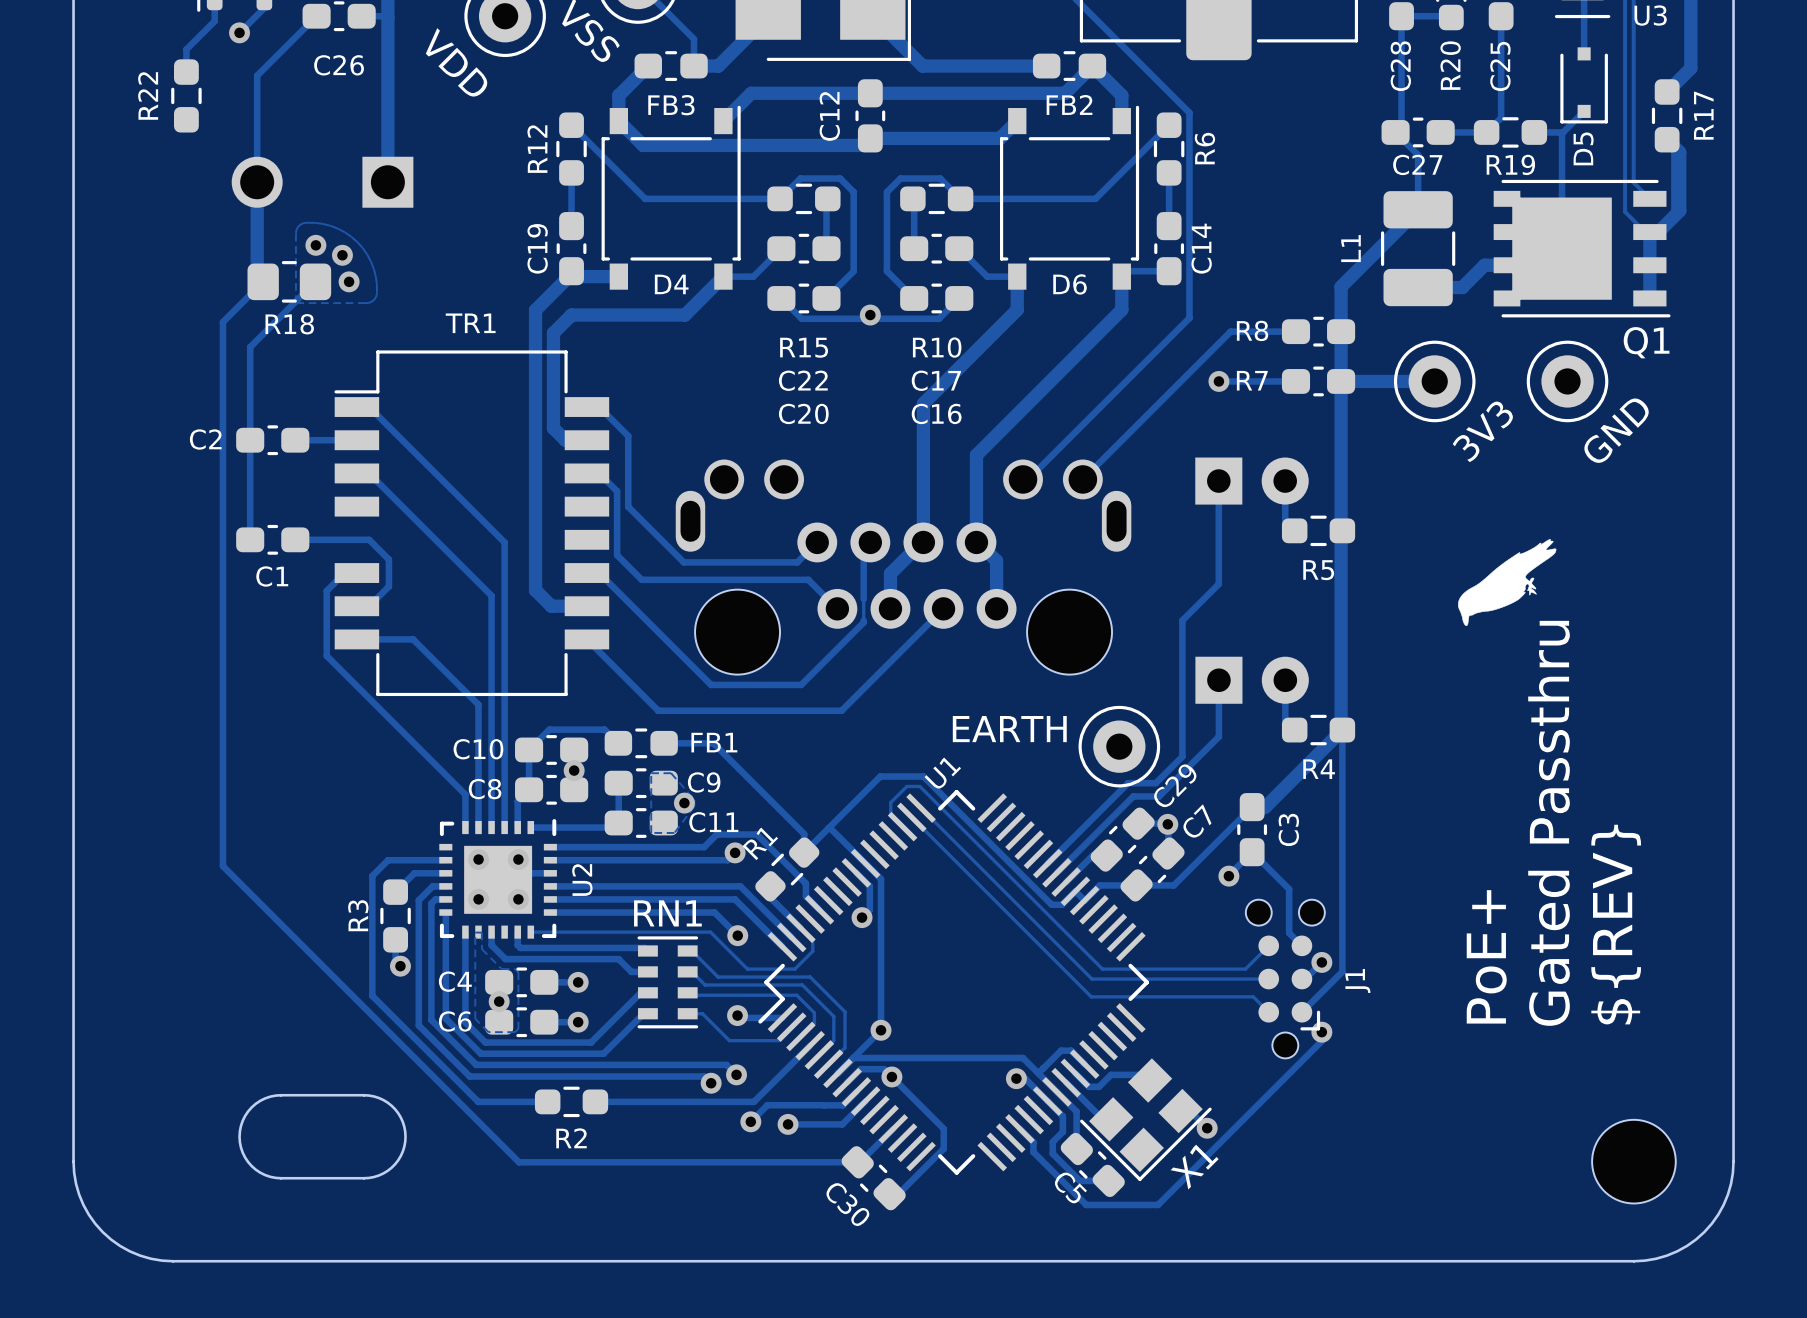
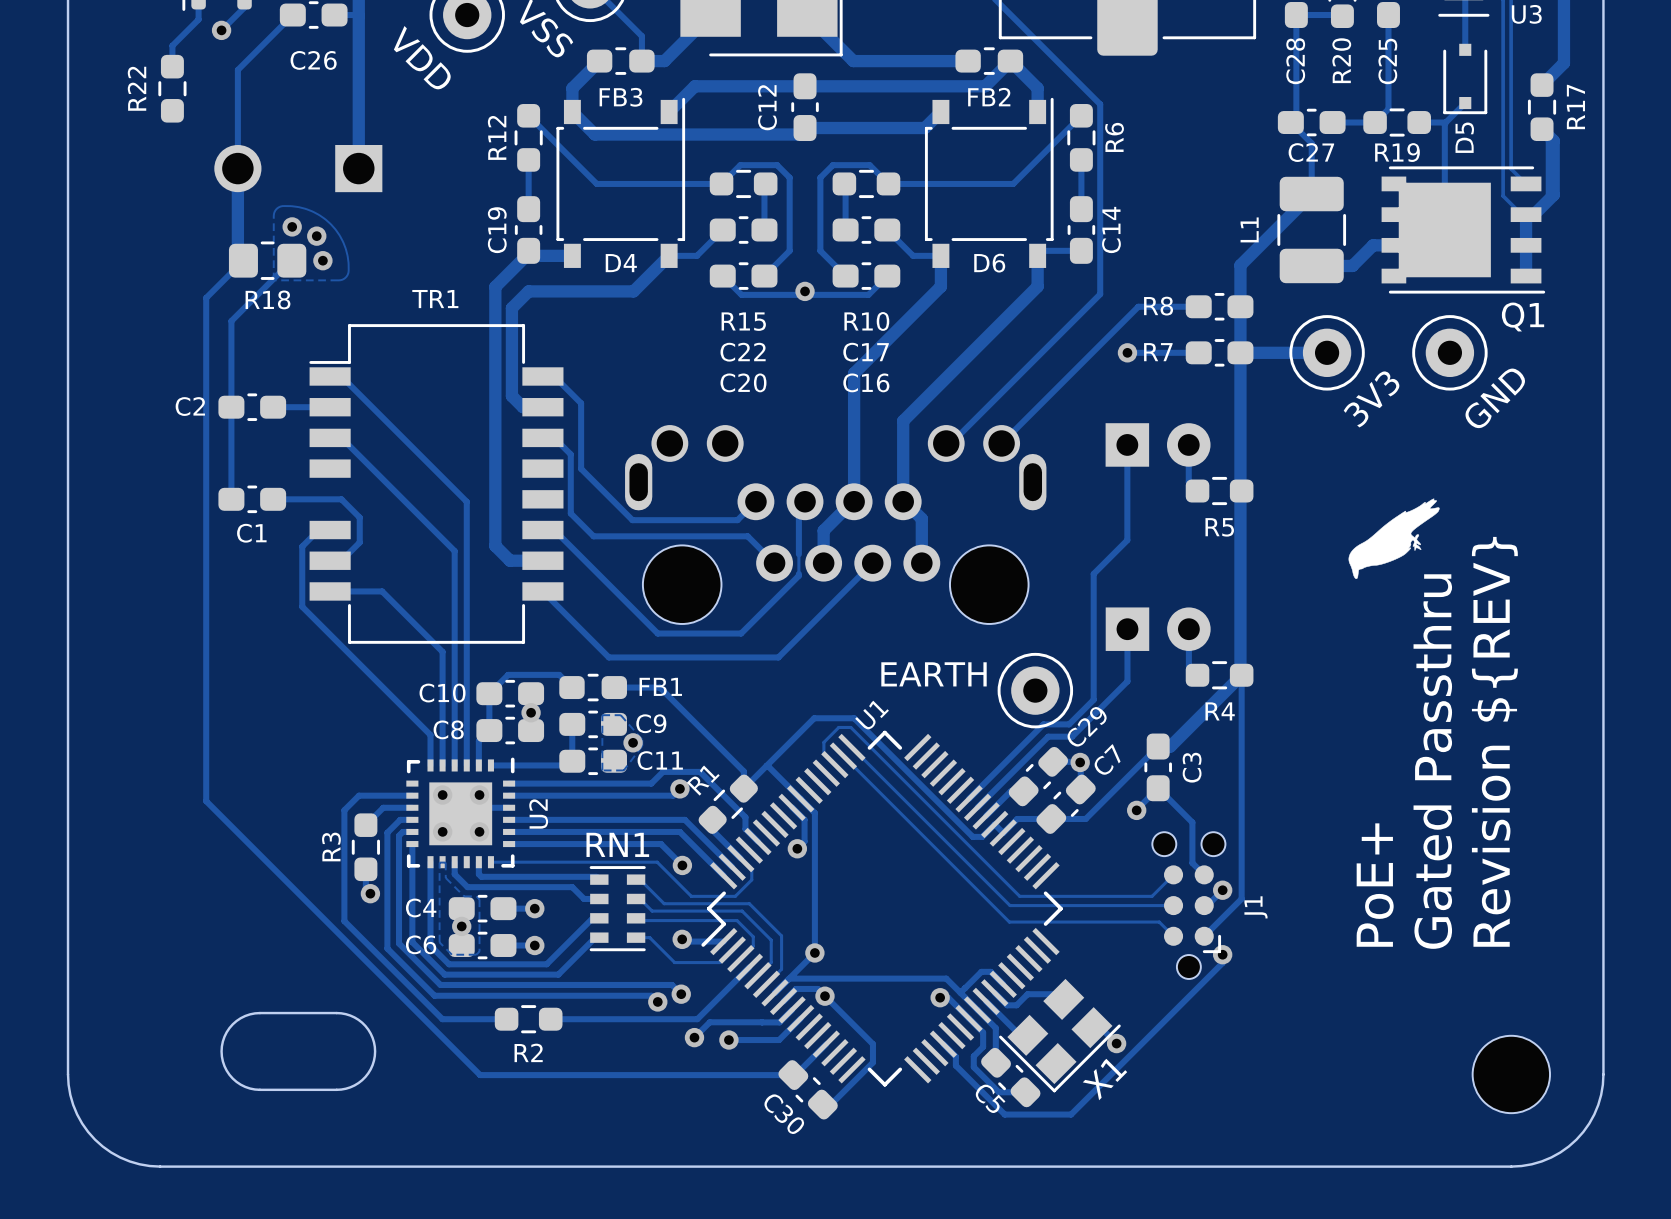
text: ${REV} (1616, 924) -> Revision ${REV} (1494, 741)

